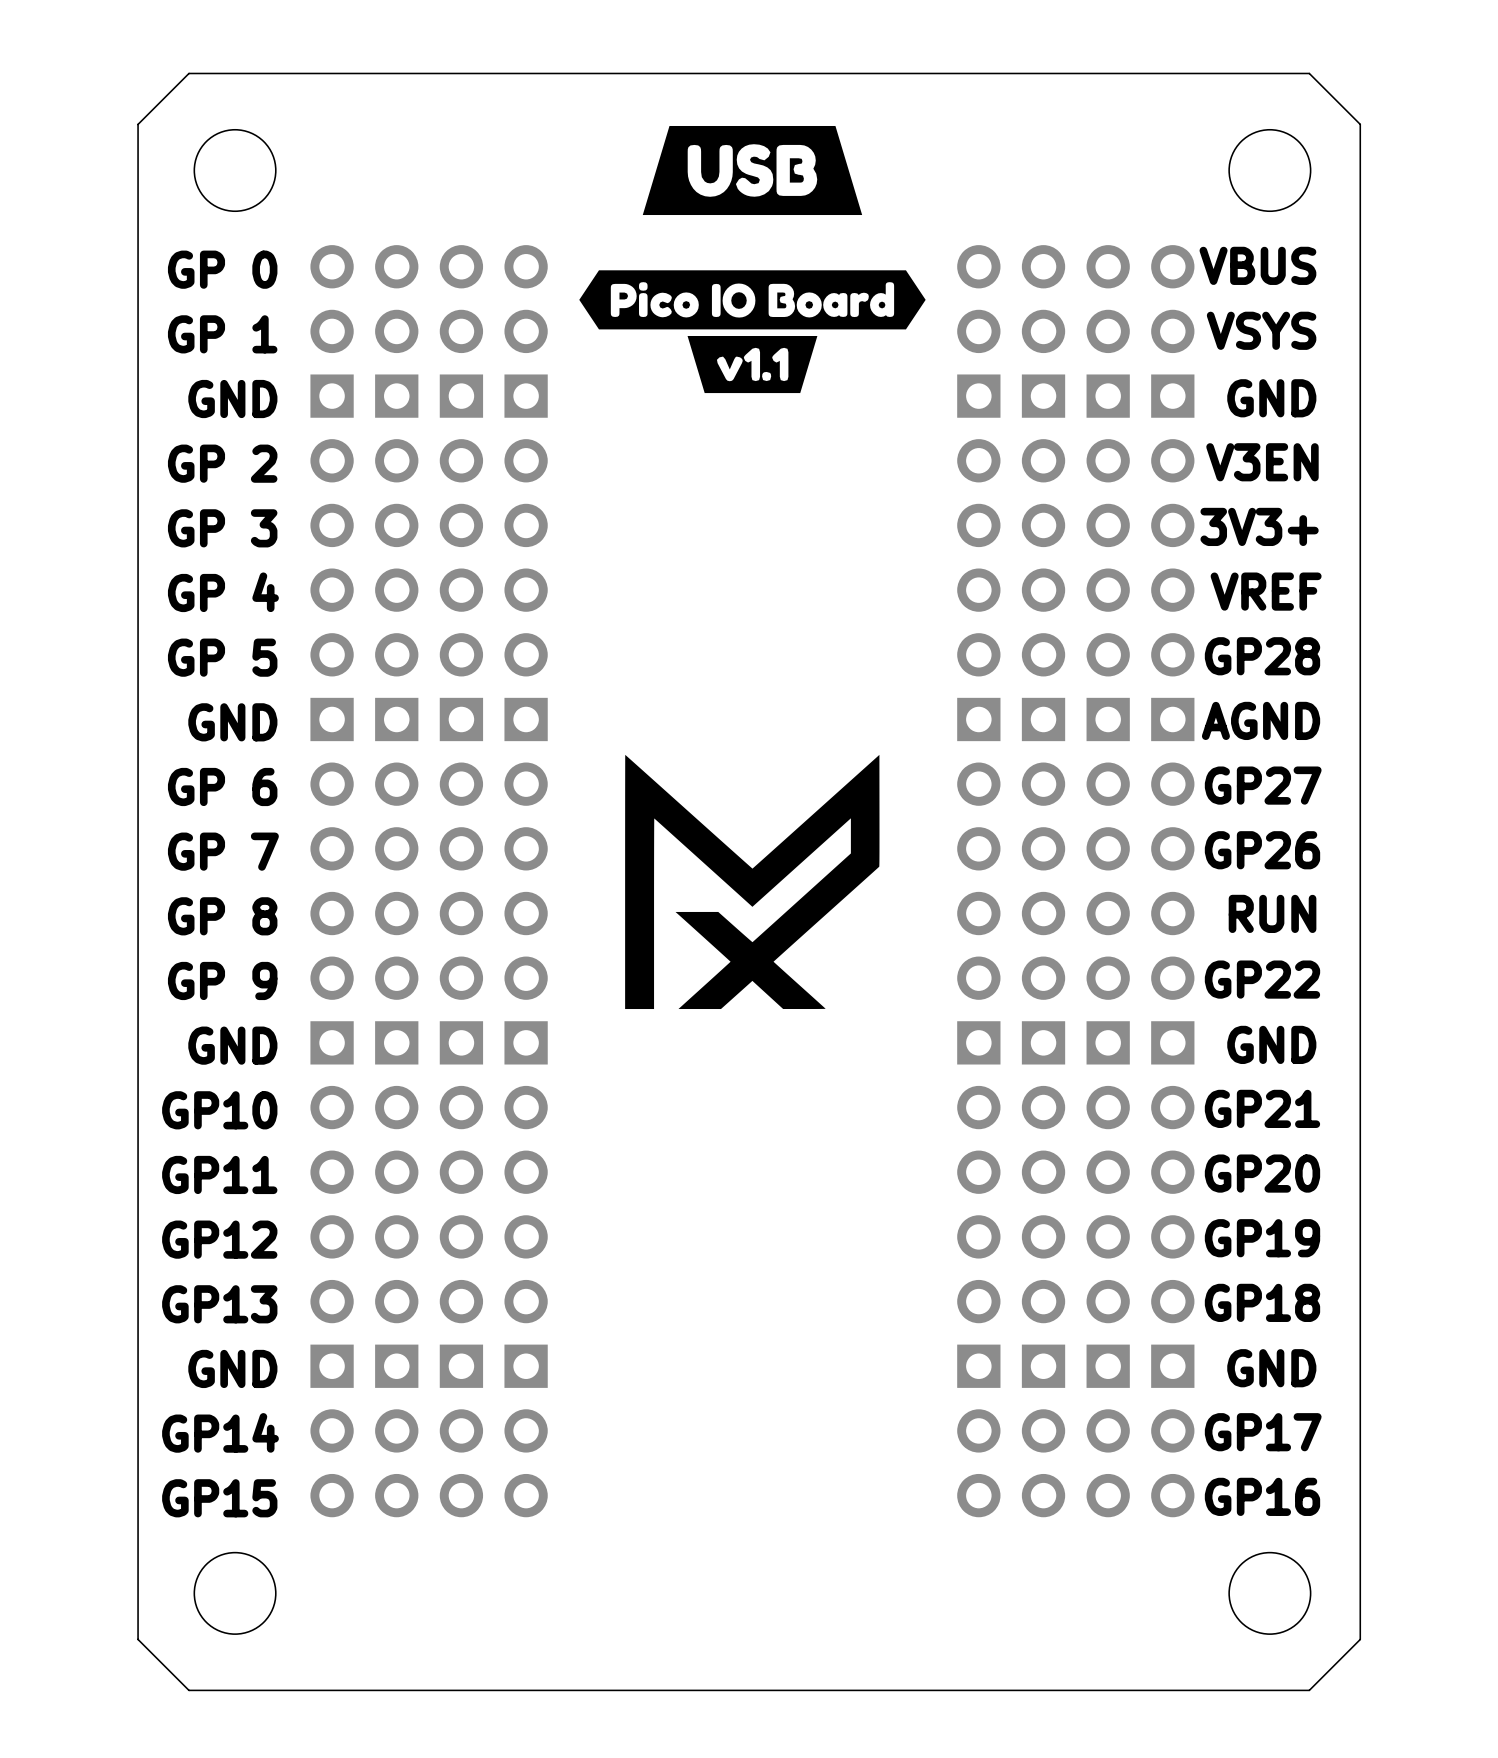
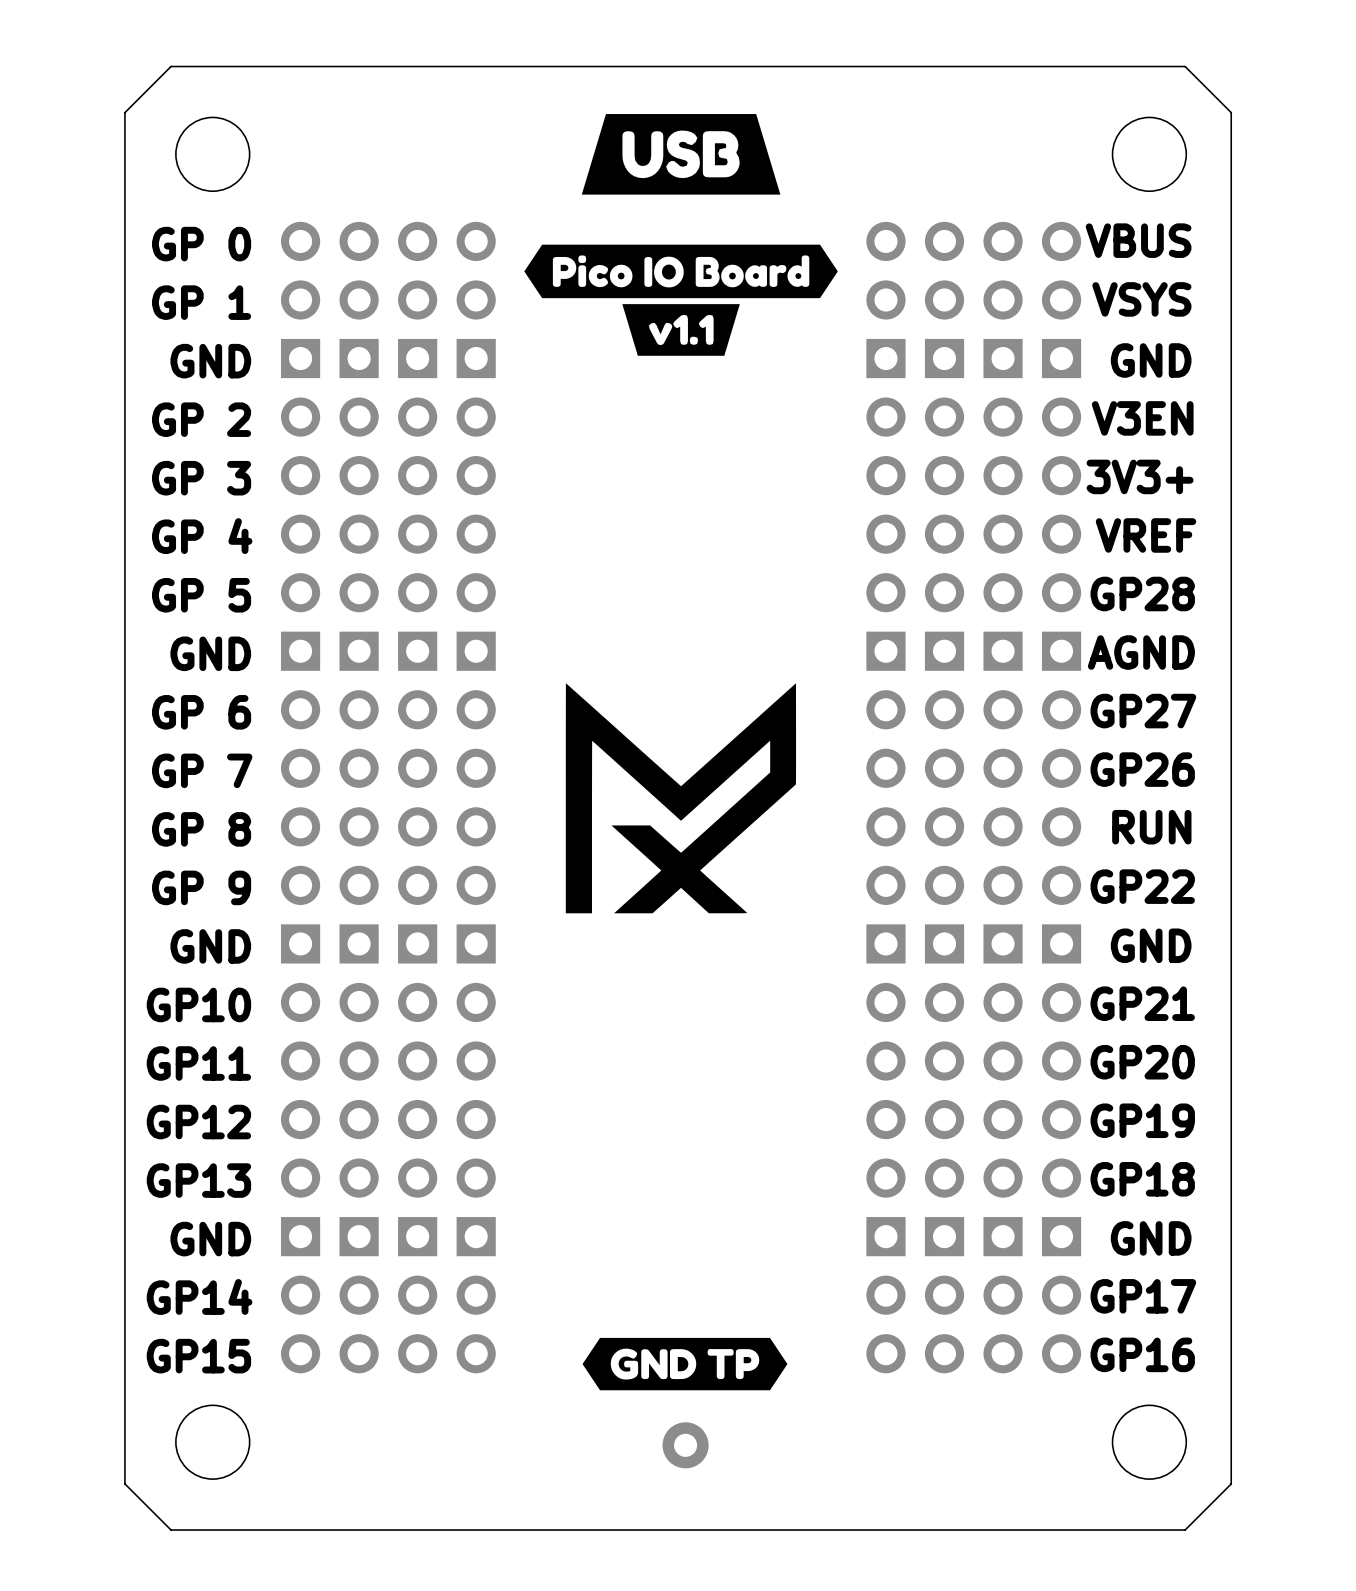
drawing: none -> [582, 1337, 788, 1391]
part: none -> (685, 1445)

